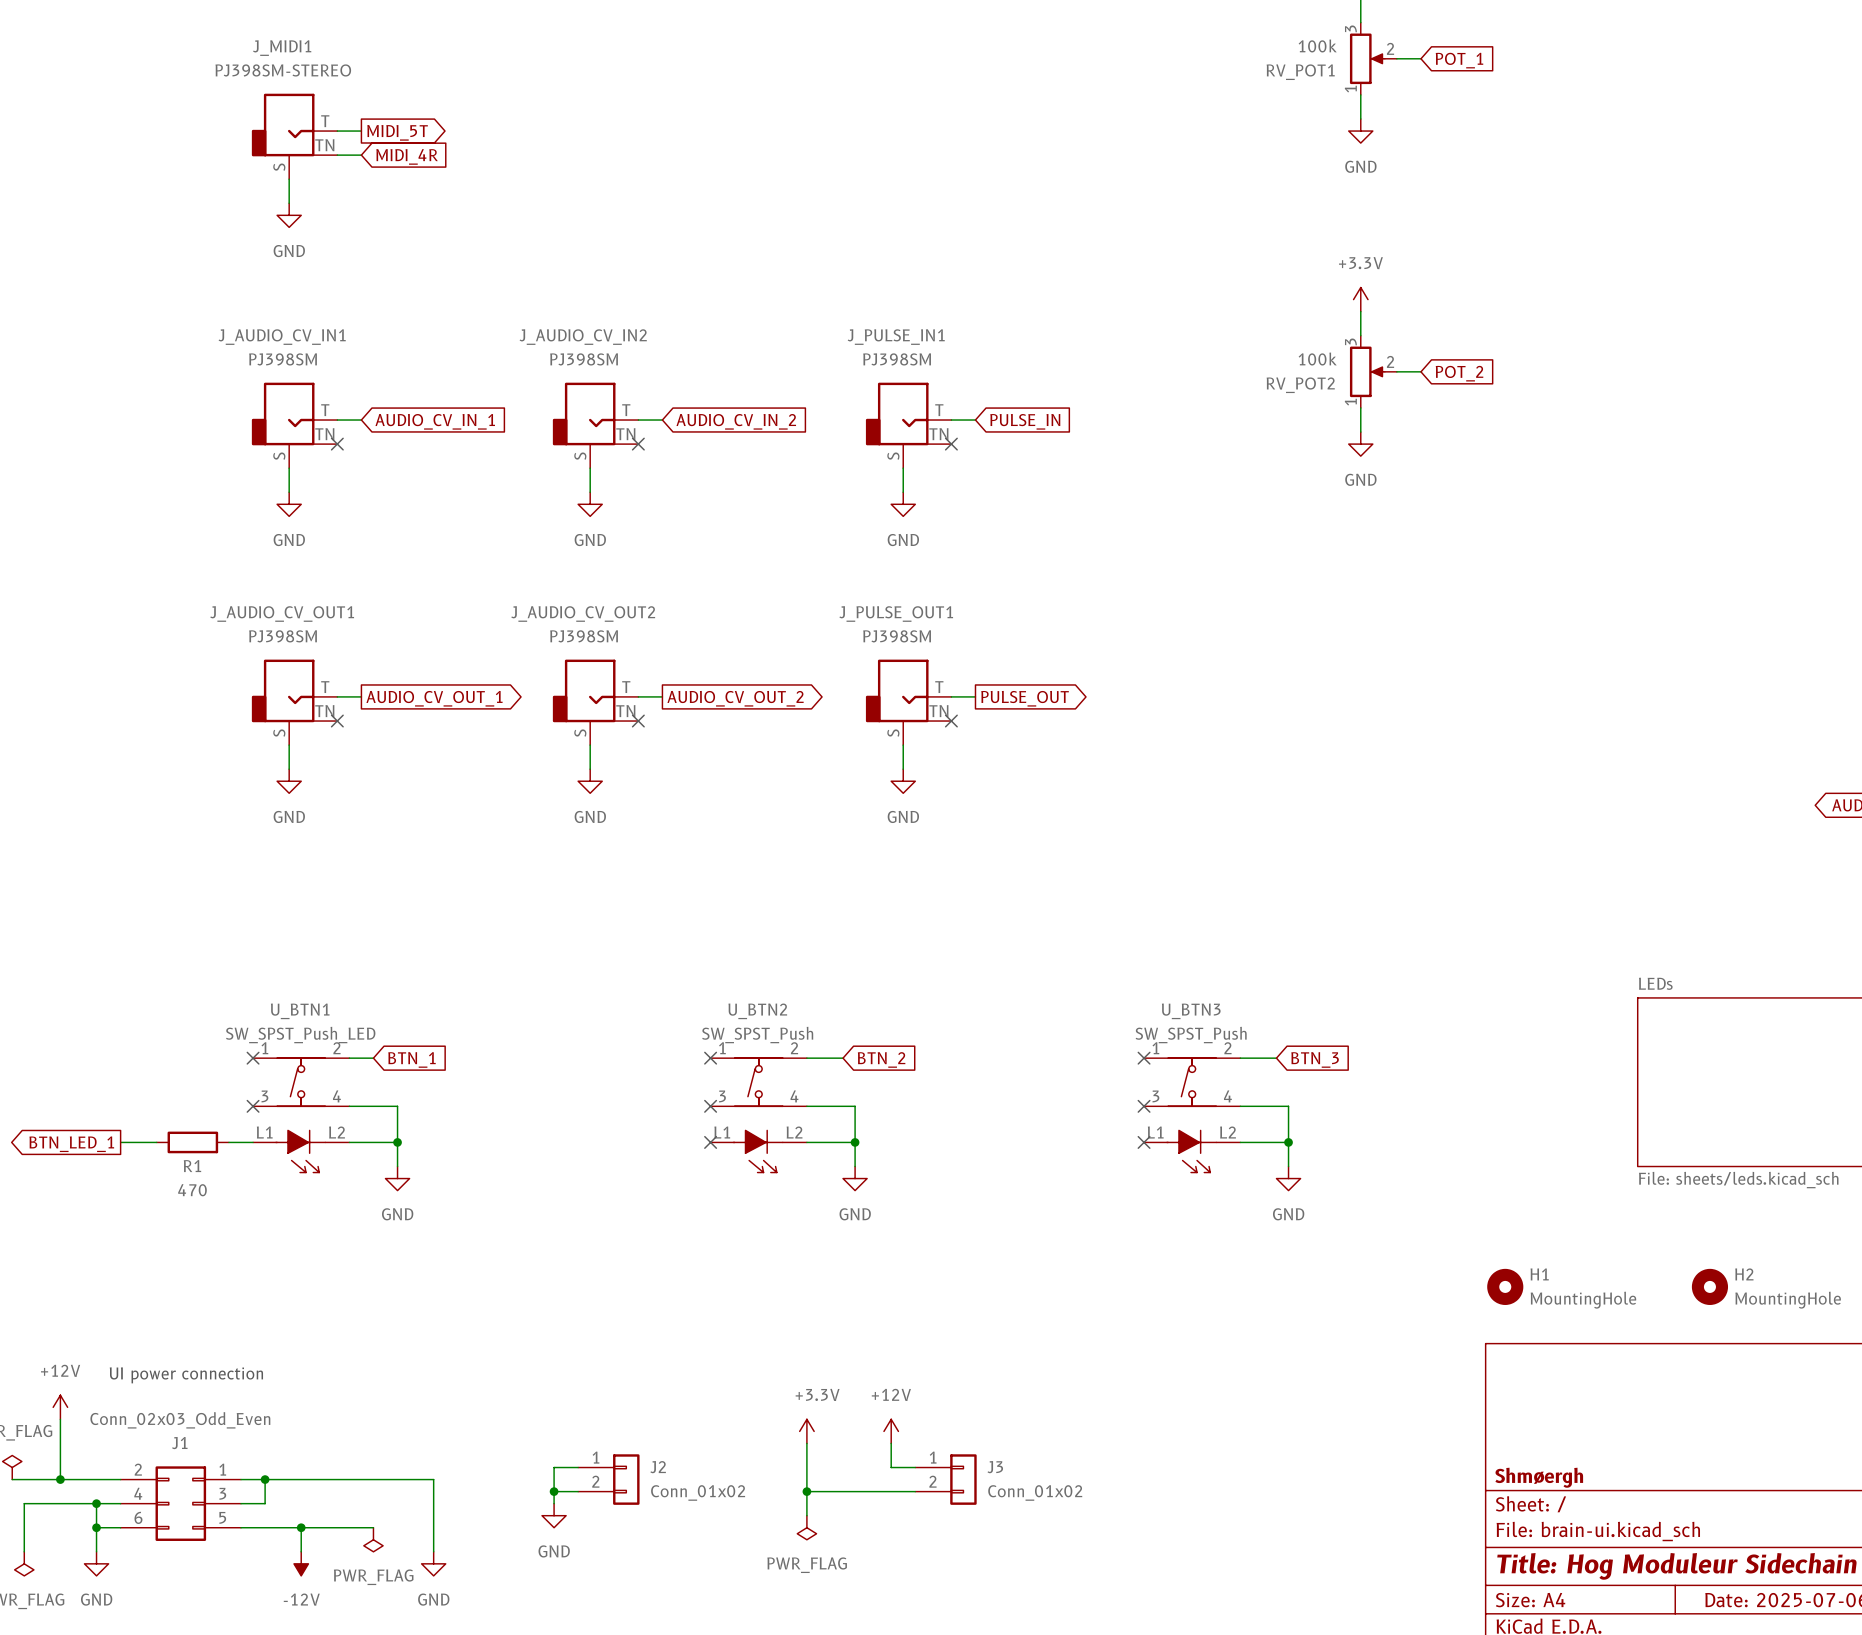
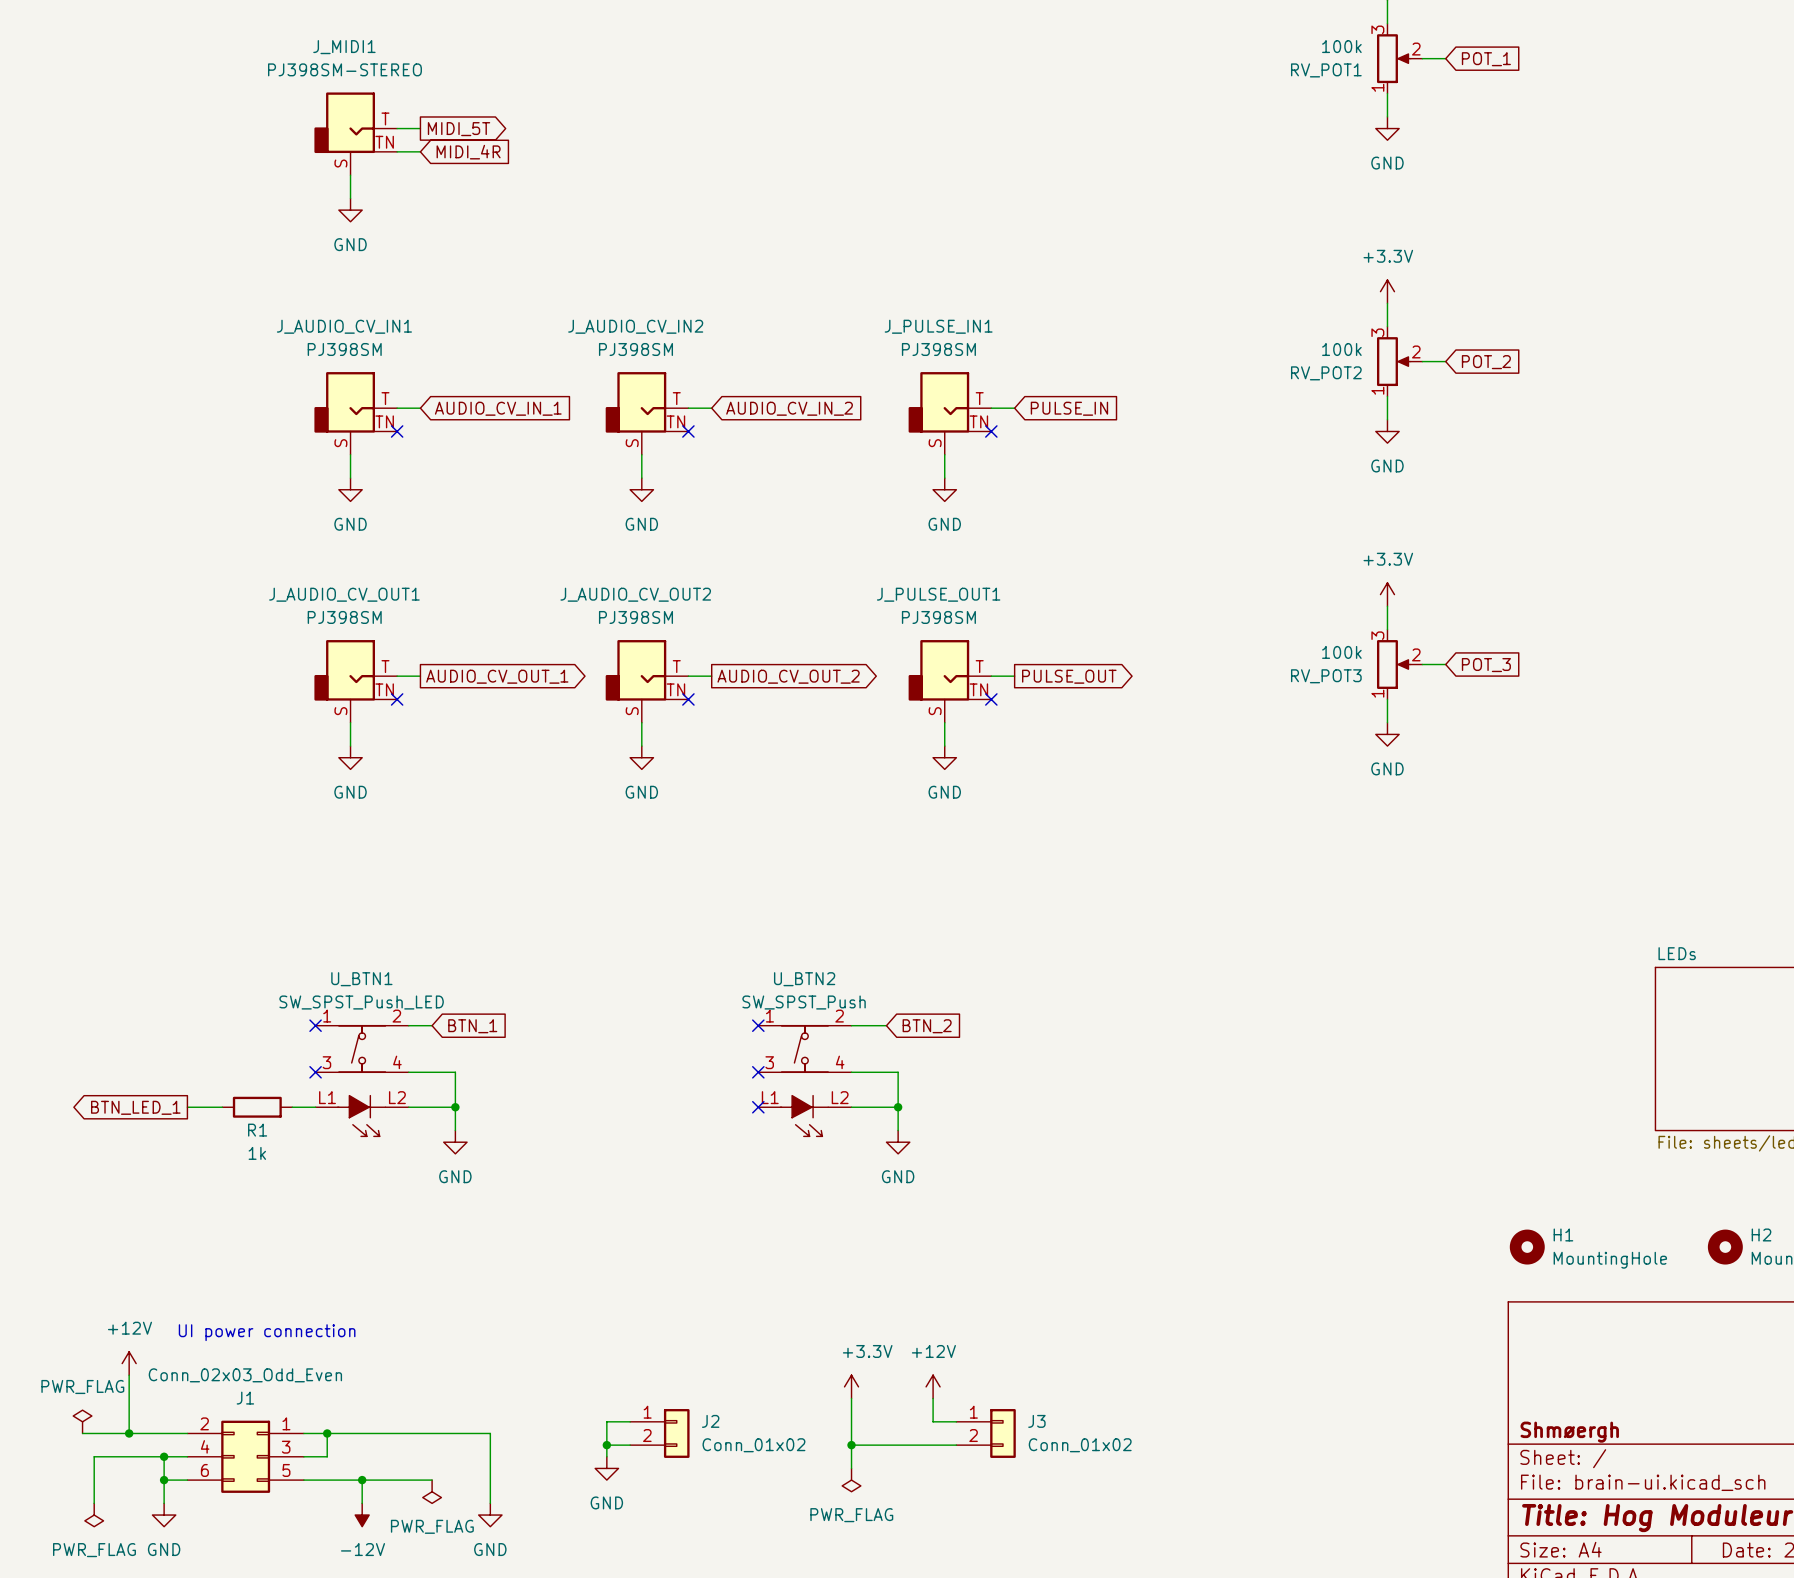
power symbol: none -> +3.3V (1387, 594)
wire: none -> (1387, 606) (1387, 629)
RV_POT3: none -> 100k (1399, 664)
wire: none -> (1422, 664) (1445, 664)
global label: none -> POT_3 (1486, 665)
wire: none -> (1387, 699) (1387, 722)
power symbol: none -> GND (1387, 734)
no-connect mark: (1144, 1058) -> none
wire: (1240, 1058) (1276, 1058) -> none
global label: BTN_3 (1315, 1059) -> none
no-connect mark: (1144, 1106) -> none
wire: (1240, 1106) (1288, 1106) (1288, 1166) -> none
U_BTN3: SW_SPST_Push (1192, 1115) -> none
no-connect mark: (1144, 1142) -> none
wire: (1240, 1142) (1288, 1142) -> none
junction: (1288, 1142) -> none
power symbol: GND (1288, 1178) -> none
R1 value: 470 (192, 1190) -> 1k (257, 1153)

